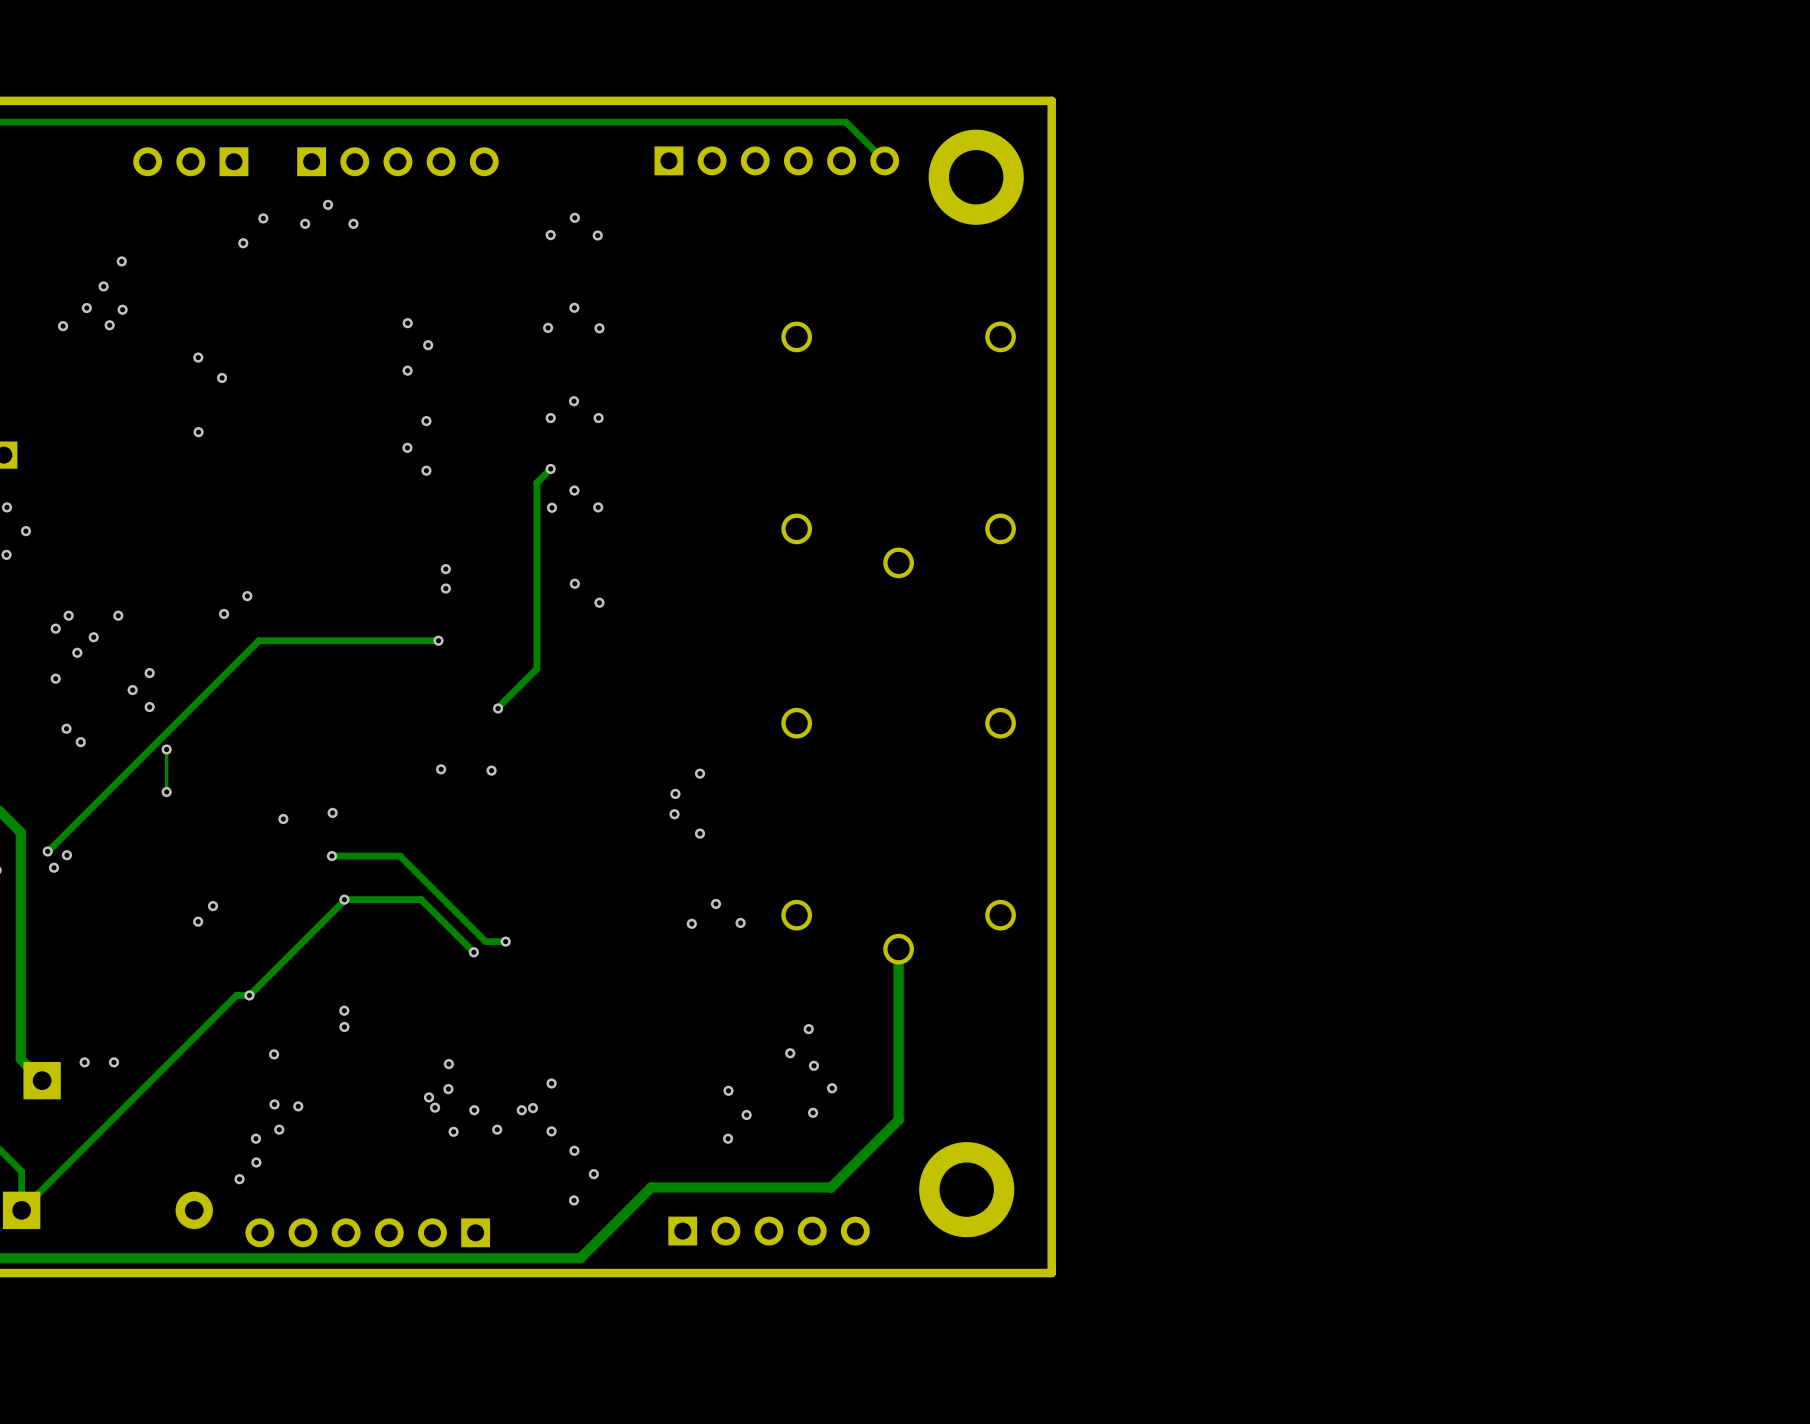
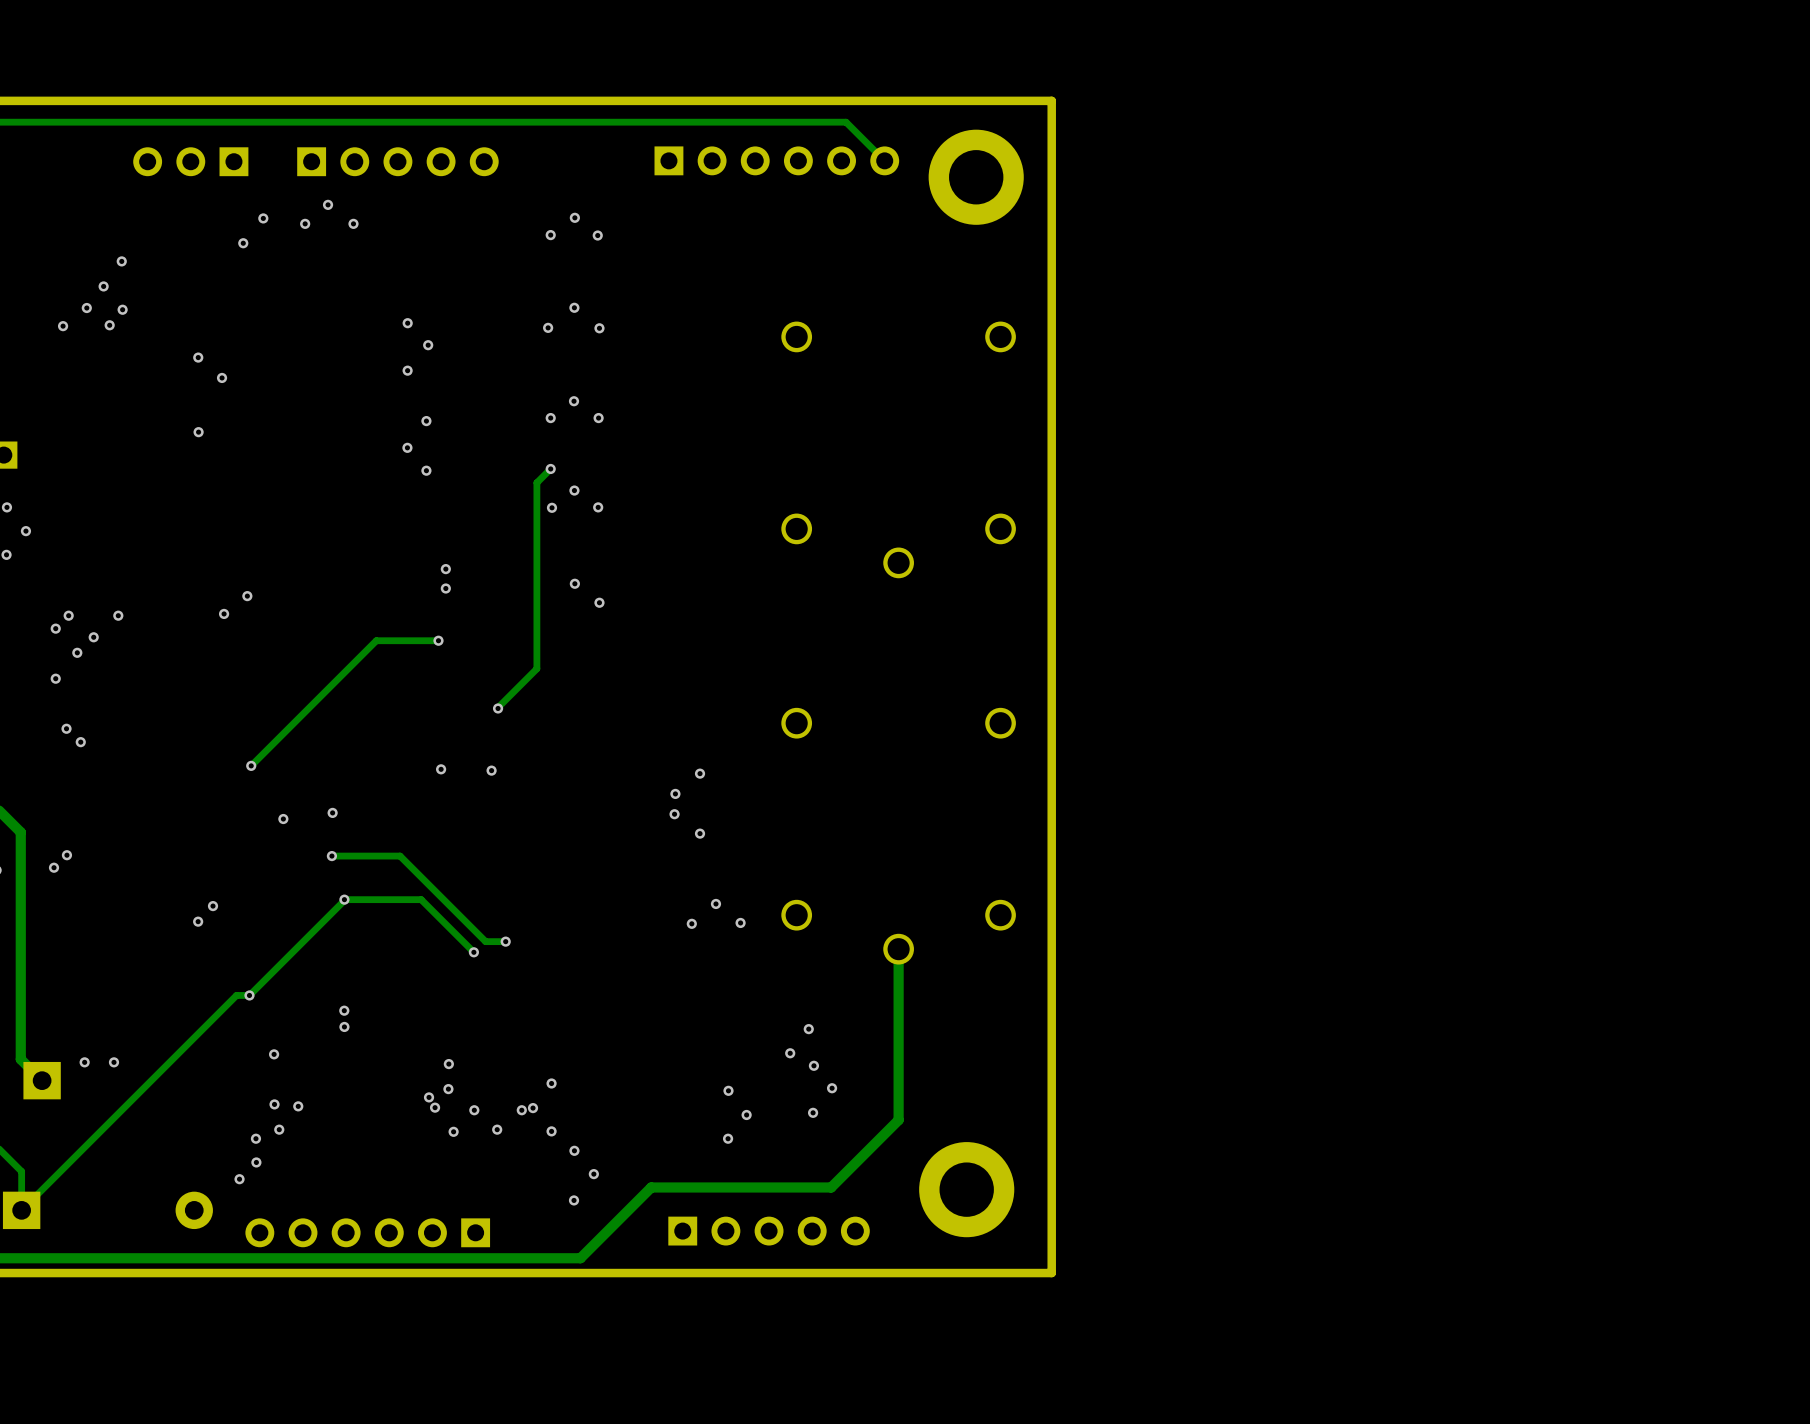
track: (376, 640) (258, 640) (47, 851) -> (376, 640) (251, 765)
via: (149, 673) -> none
via: (132, 690) -> none
via: (149, 707) -> none
track: (166, 749) (166, 792) -> none
via: (166, 749) -> none
via: none -> (251, 765)
via: (166, 792) -> none
via: (47, 851) -> none

